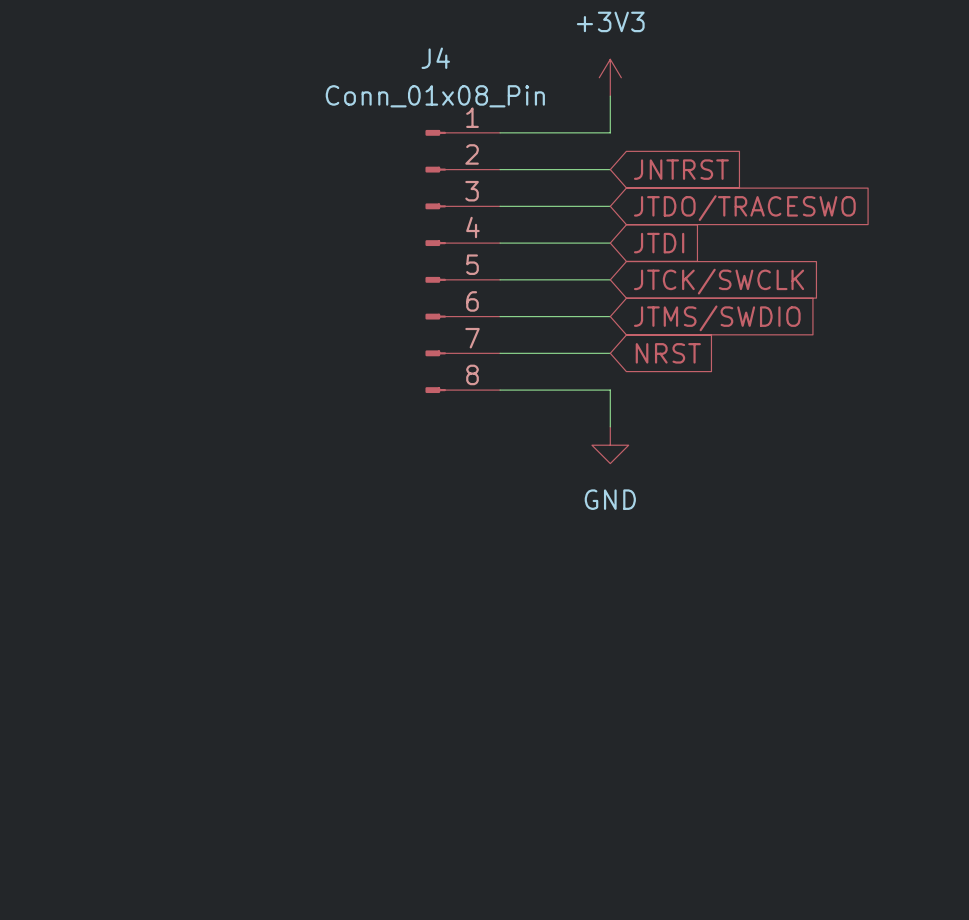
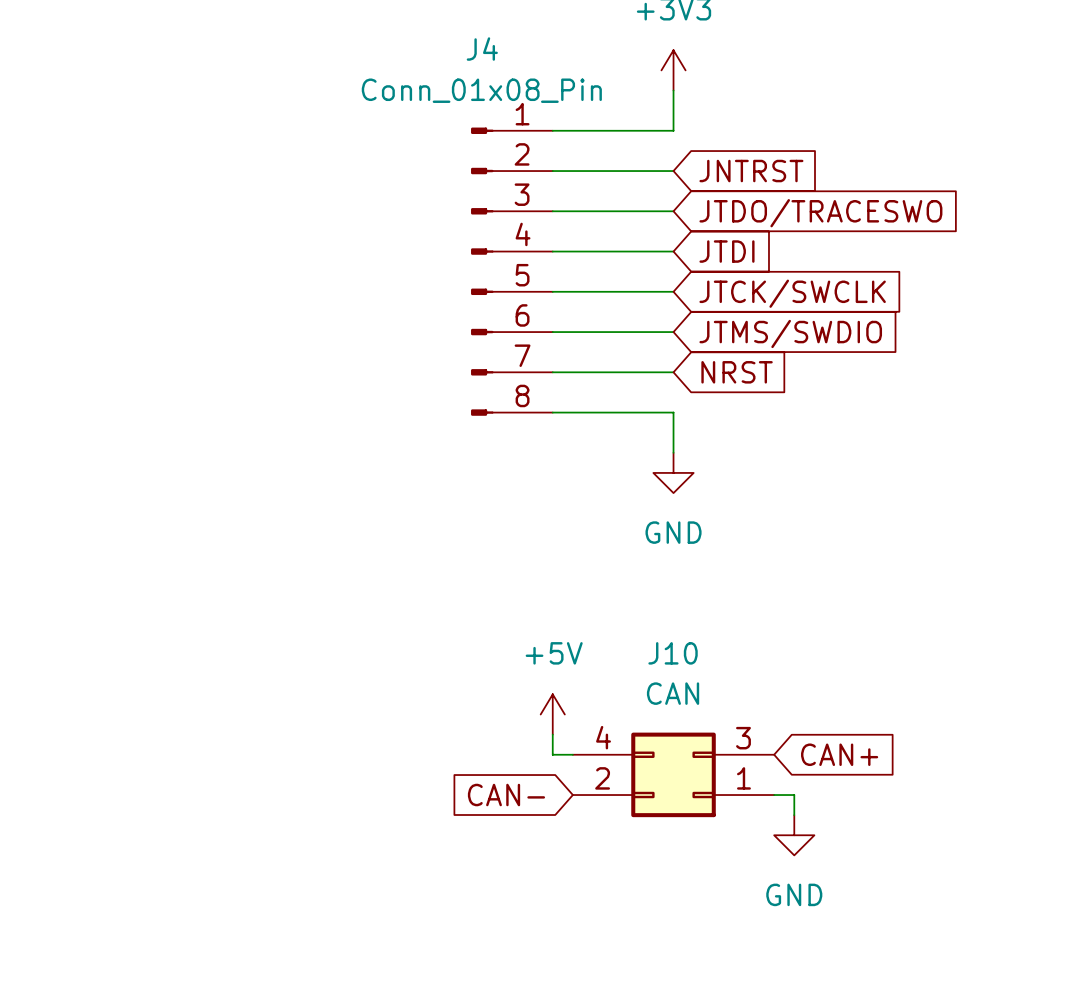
power symbol: none -> +5V (552, 714)
wire: none -> (552, 734) (552, 754) (572, 754)
global label: none -> CAN+ (839, 754)
J10: none -> CAN (673, 774)
global label: none -> CAN- (506, 795)
wire: none -> (774, 795) (794, 795) (794, 815)
power symbol: none -> GND (794, 835)

